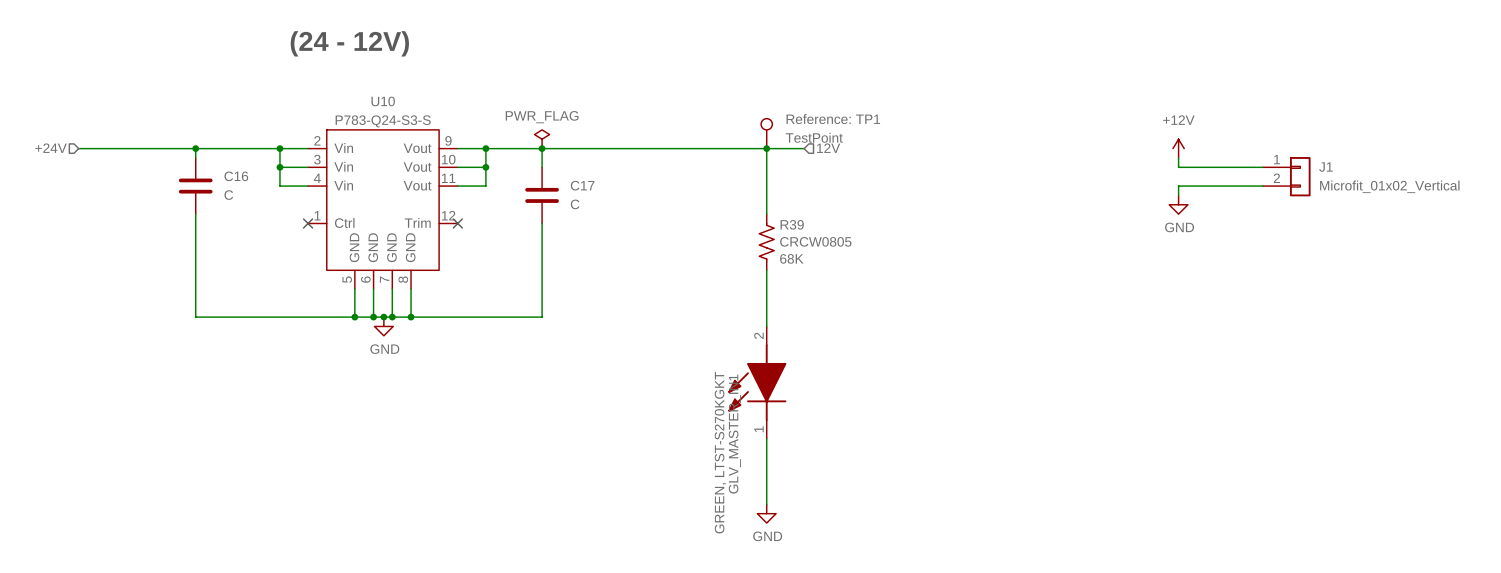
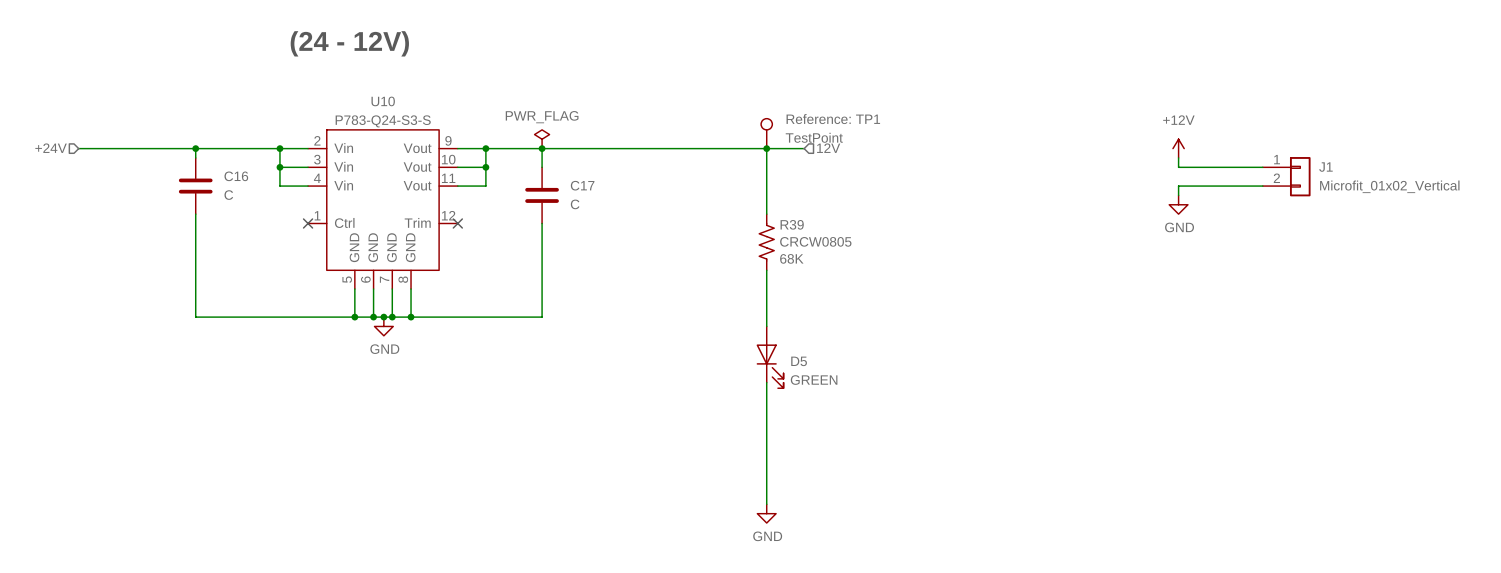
D5: none -> GREEN (770, 357)
GLV_MASTER_IN1: GREEN, LTST-S270KGKT (757, 382) -> none

